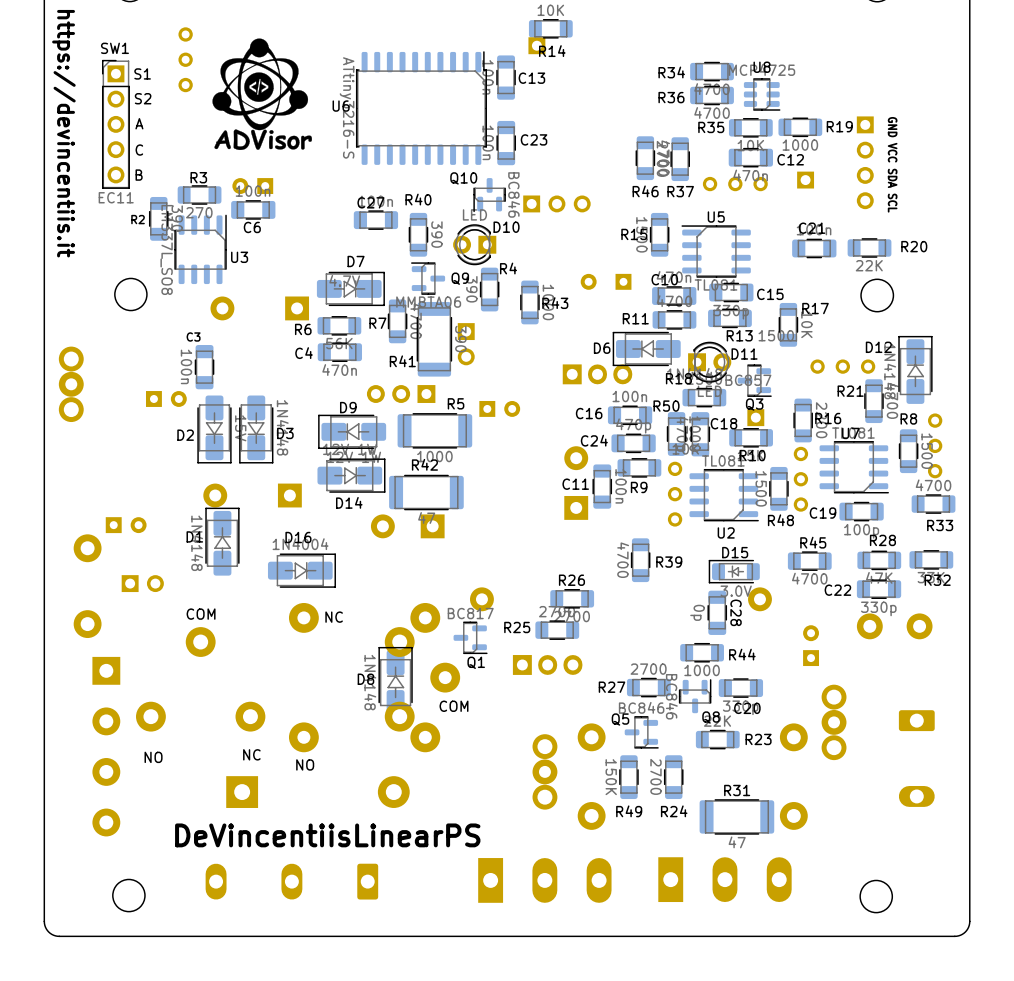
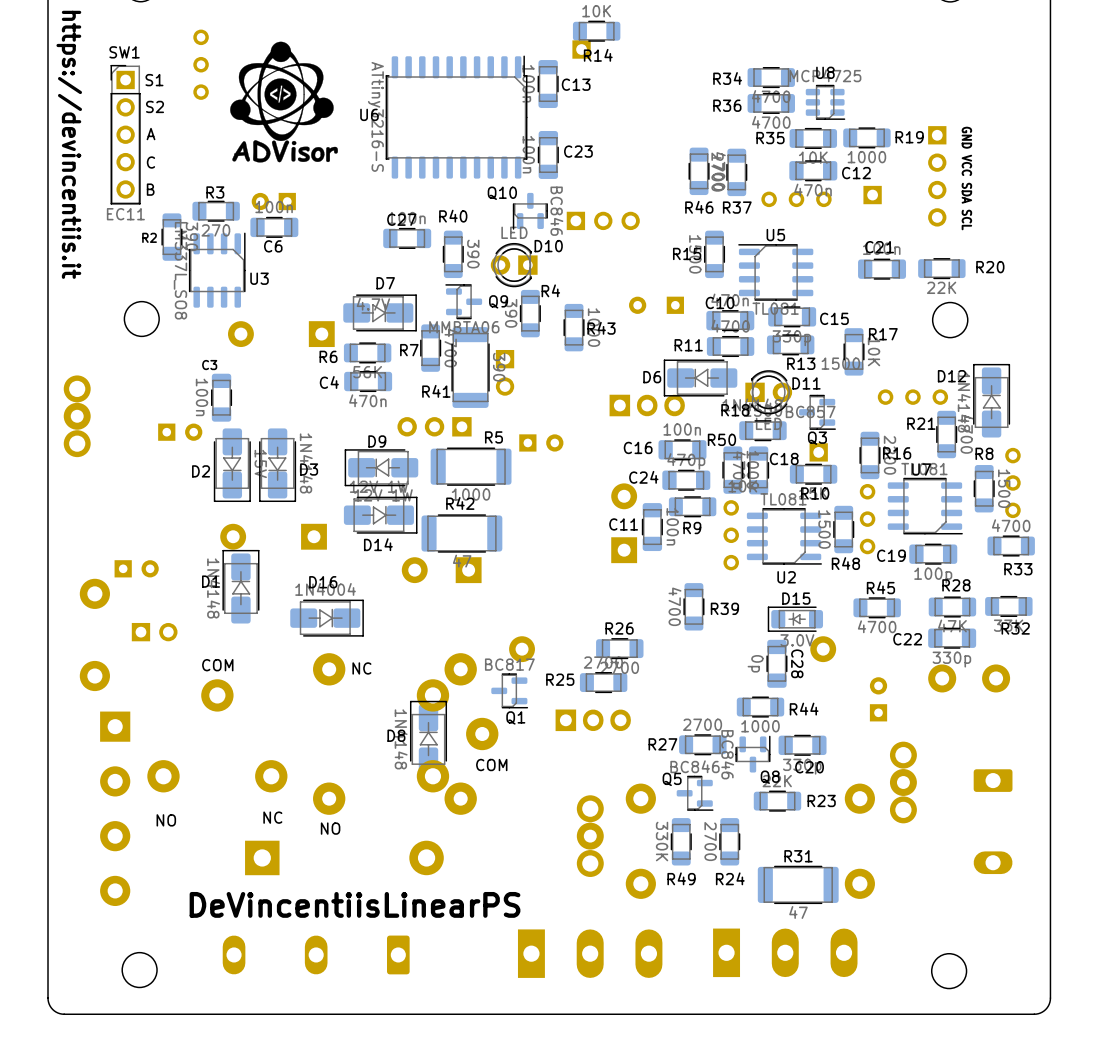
R49 value: 150K (611, 777) -> 330K (662, 841)

